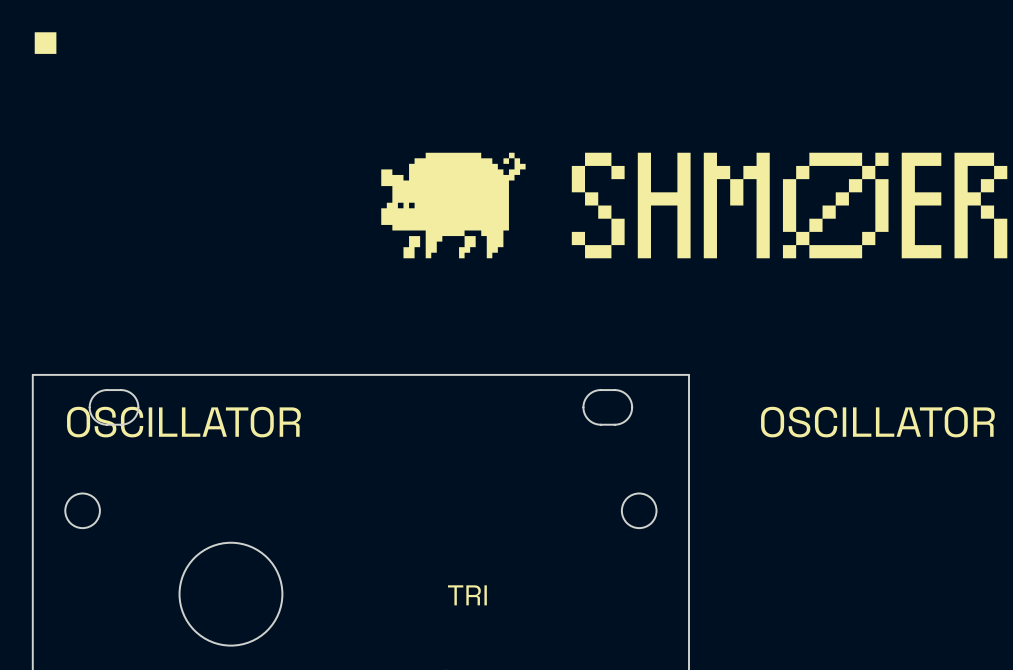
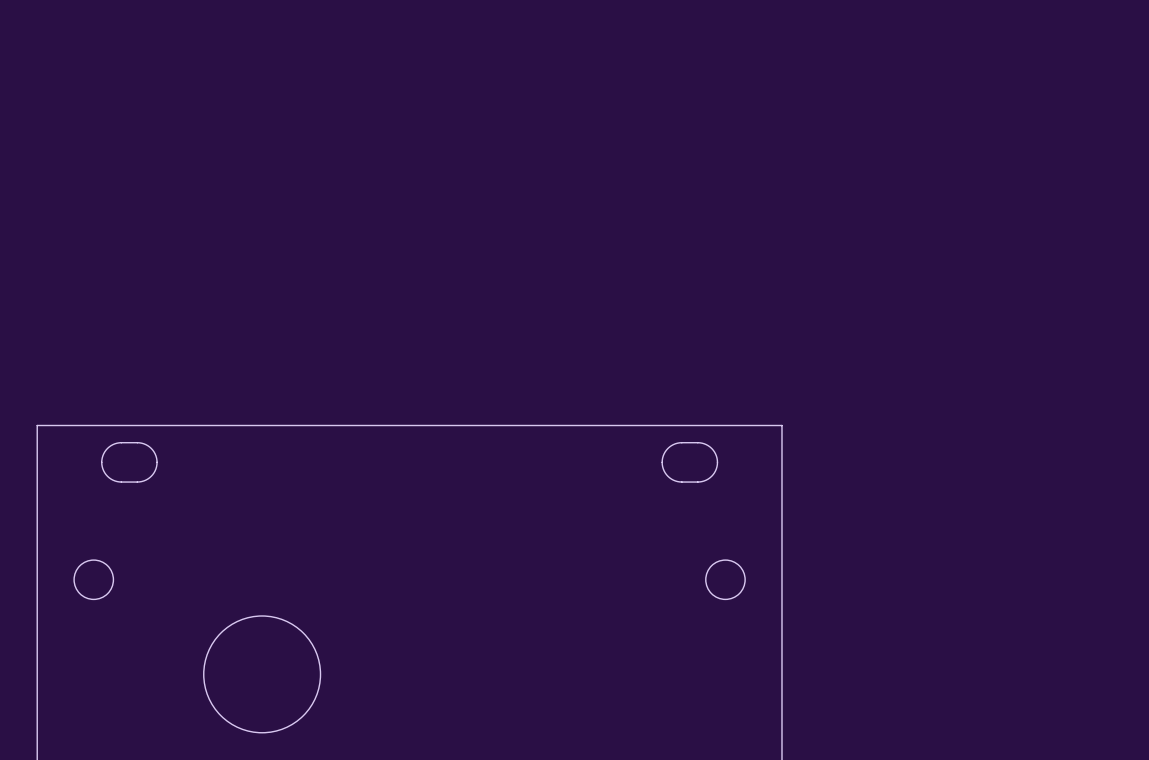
drawing: [34, 32, 57, 54] -> none
drawing: [381, 152, 526, 259] -> none
drawing: [571, 152, 625, 259] -> none
drawing: [637, 152, 691, 259] -> none
drawing: [703, 152, 770, 259] -> none
drawing: [782, 152, 889, 259] -> none
drawing: [901, 152, 942, 259] -> none
drawing: [954, 152, 1008, 259] -> none
drawing: [67, 406, 301, 438] -> none
drawing: [761, 406, 995, 438] -> none
drawing: [447, 585, 487, 606] -> none

